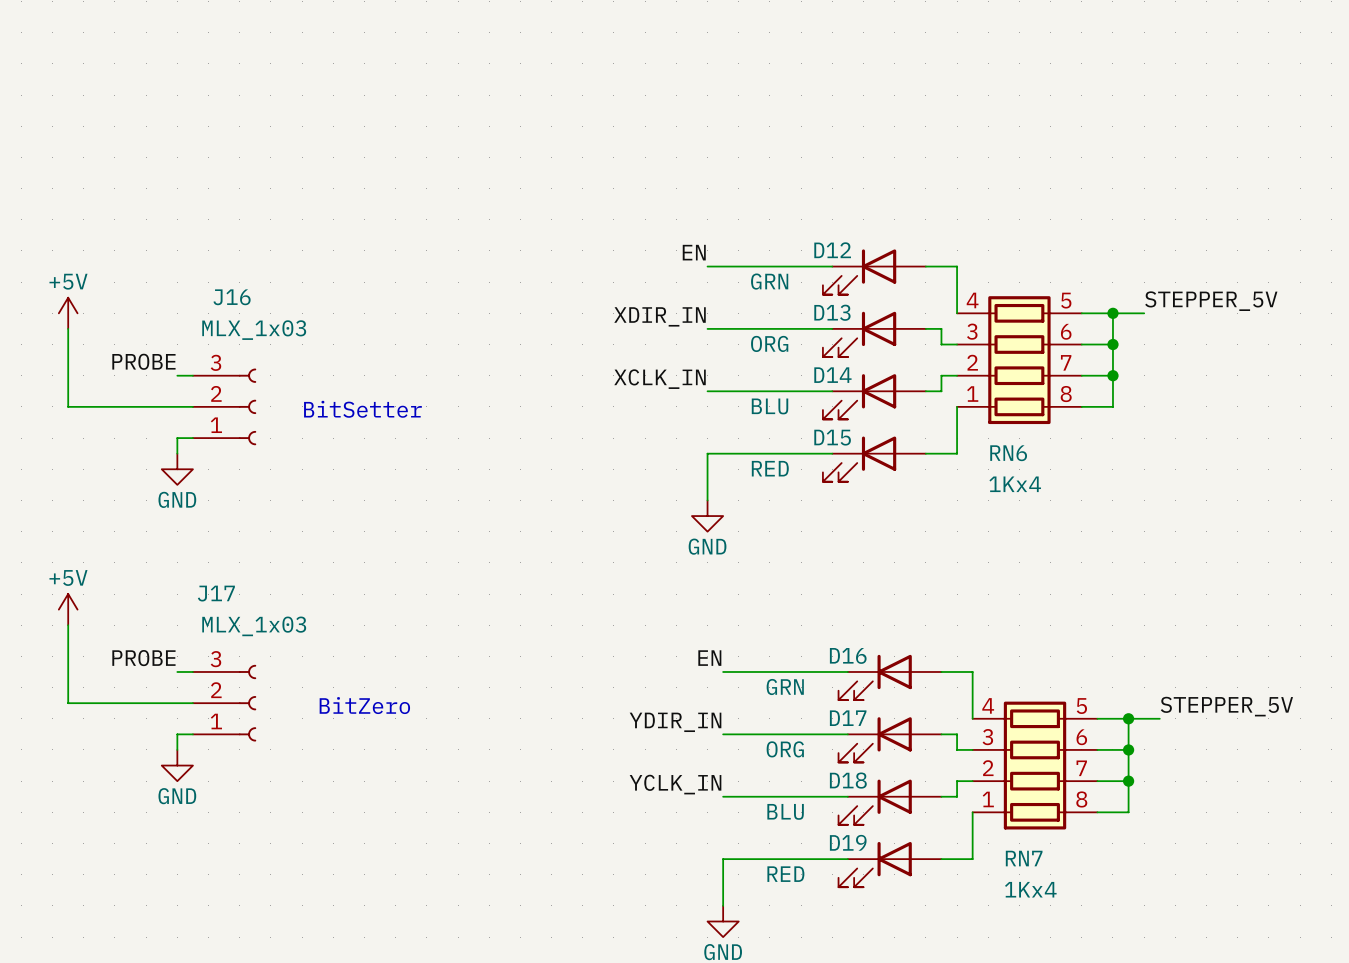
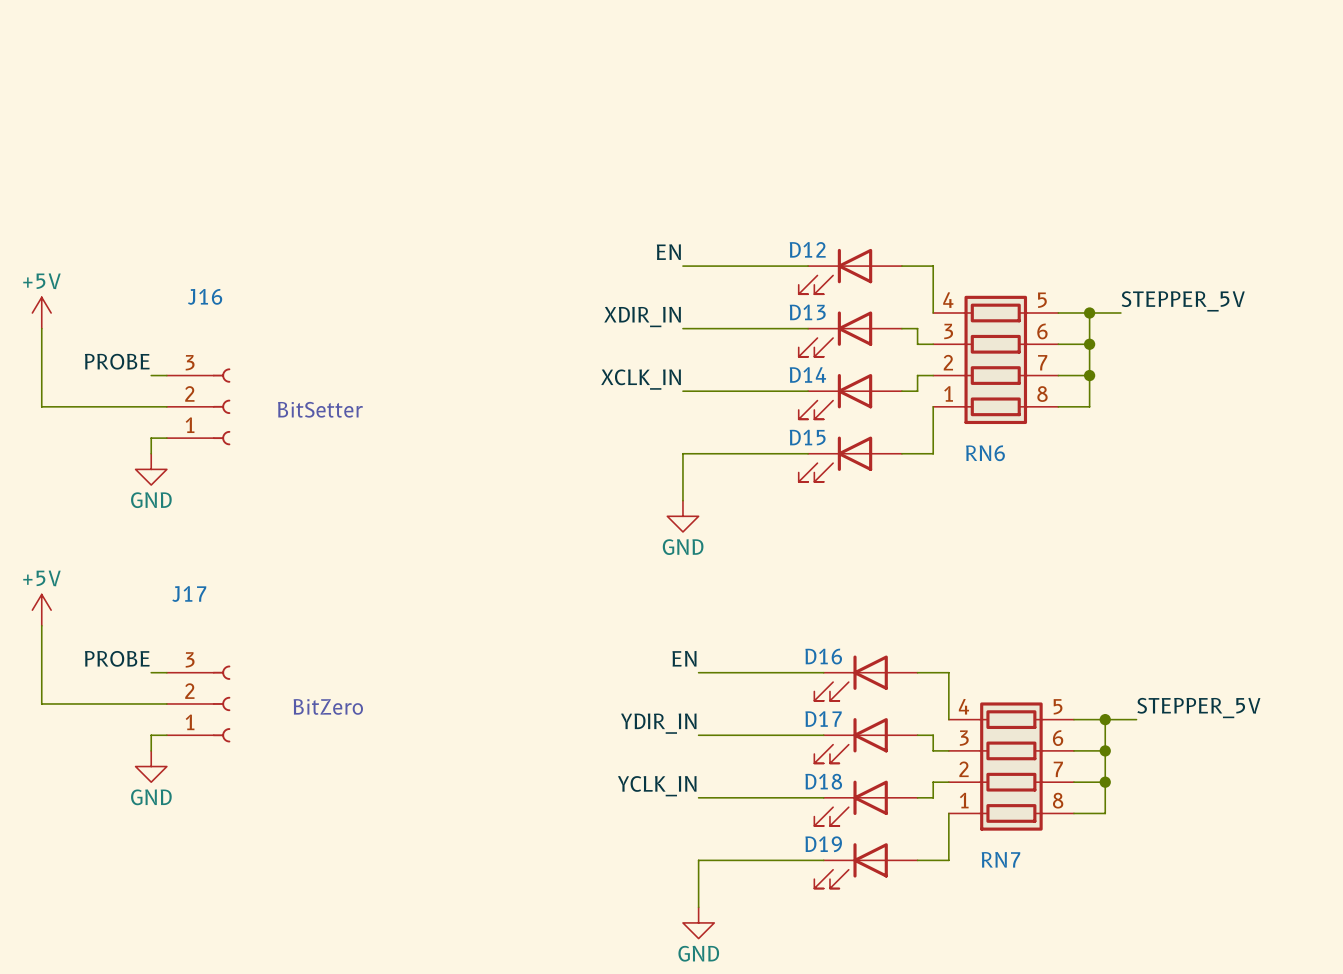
D12 value: GRN (769, 281) -> none
J16 value: MLX_1x03 (254, 330) -> none
D13 value: ORG (769, 343) -> none
D14 value: BLU (770, 406) -> none
D15 value: RED (770, 468) -> none
RN6 value: 1Kx4 (1015, 484) -> none
J17 value: MLX_1x03 (254, 626) -> none
D16 value: GRN (785, 687) -> none
D17 value: ORG (785, 749) -> none
D18 value: BLU (785, 811) -> none
D19 value: RED (785, 874) -> none
RN7 value: 1Kx4 (1030, 889) -> none

